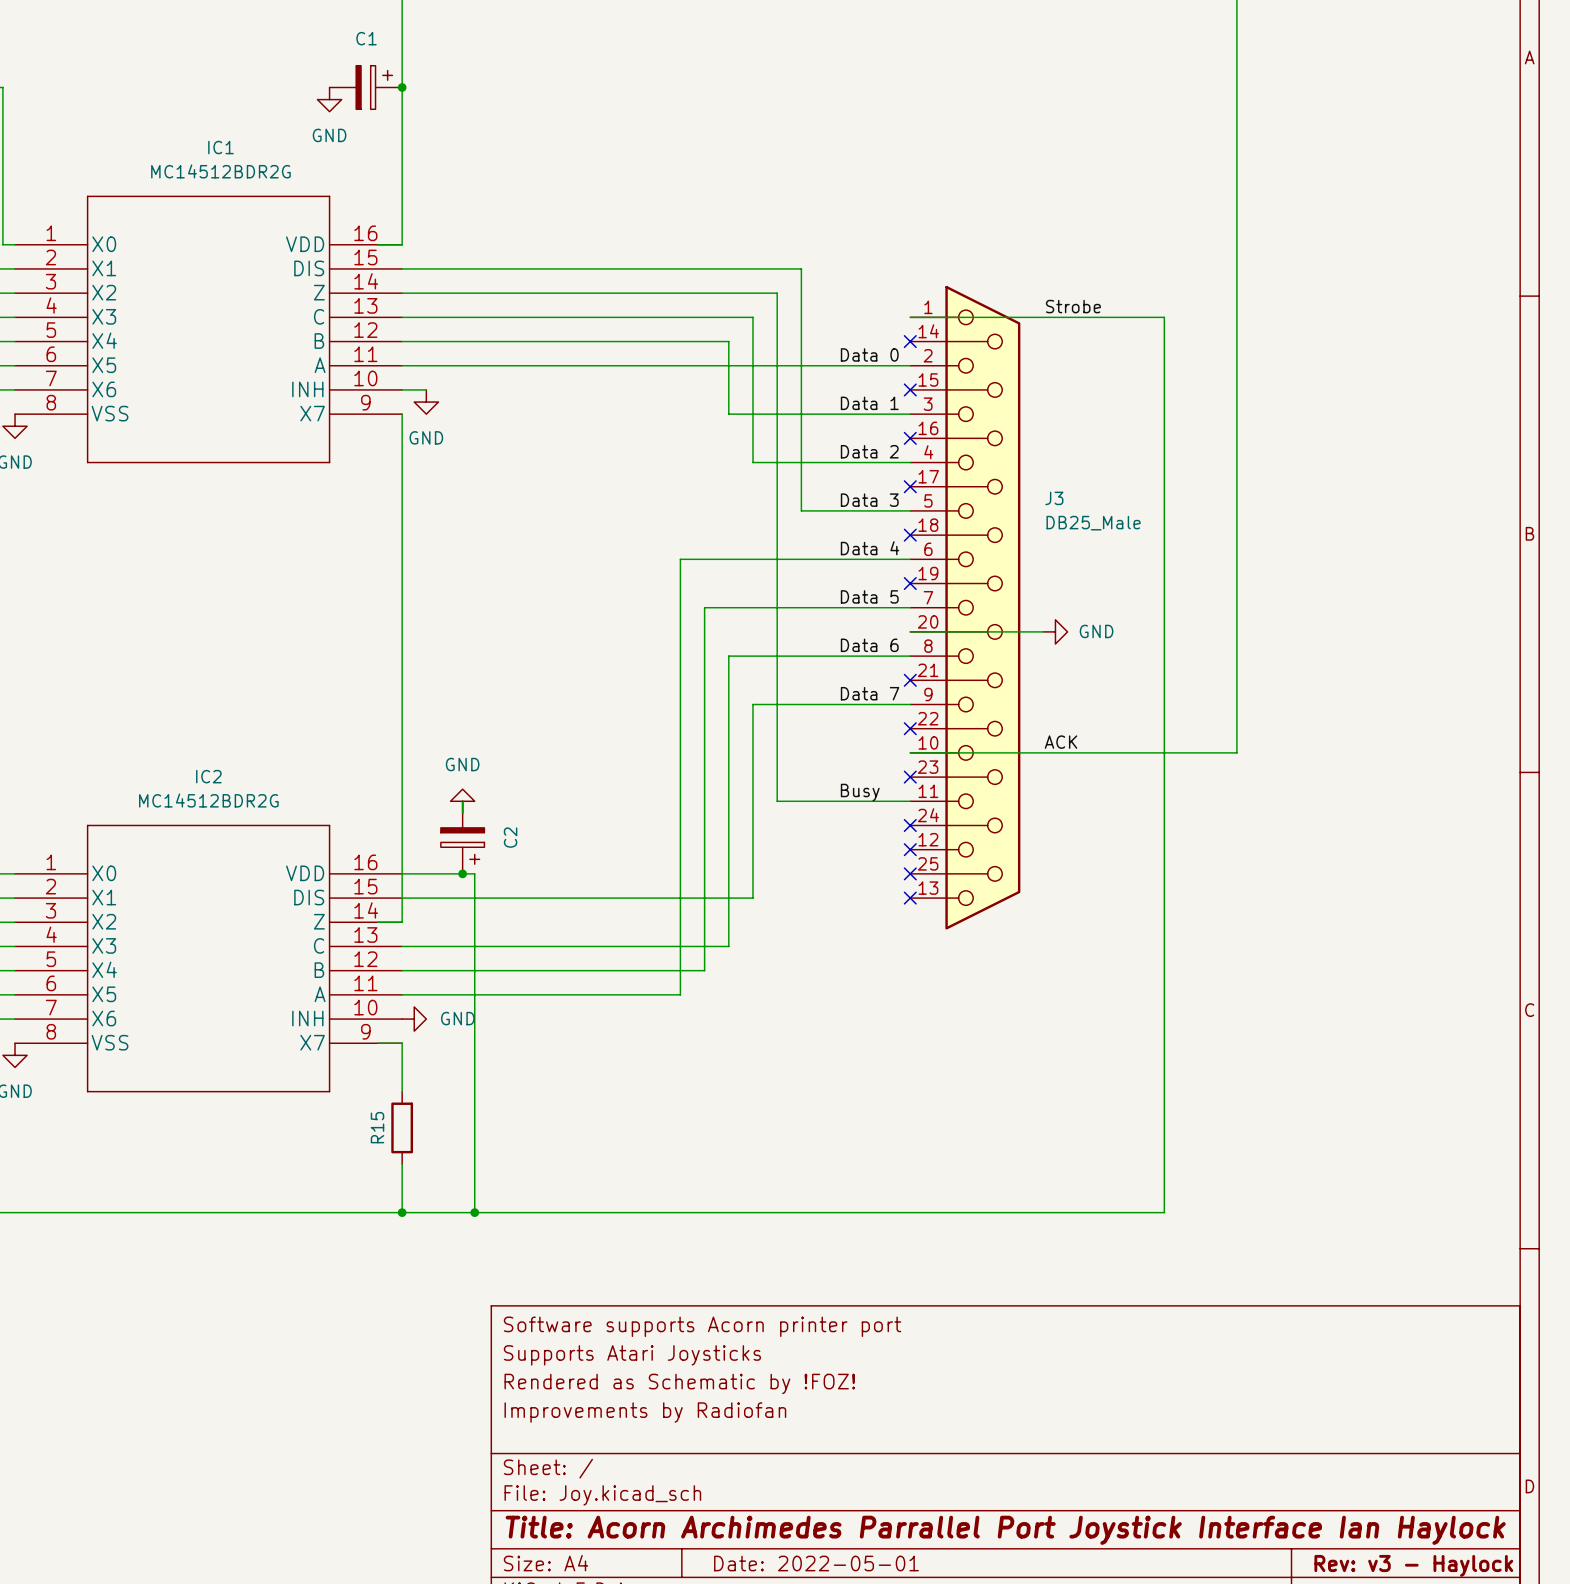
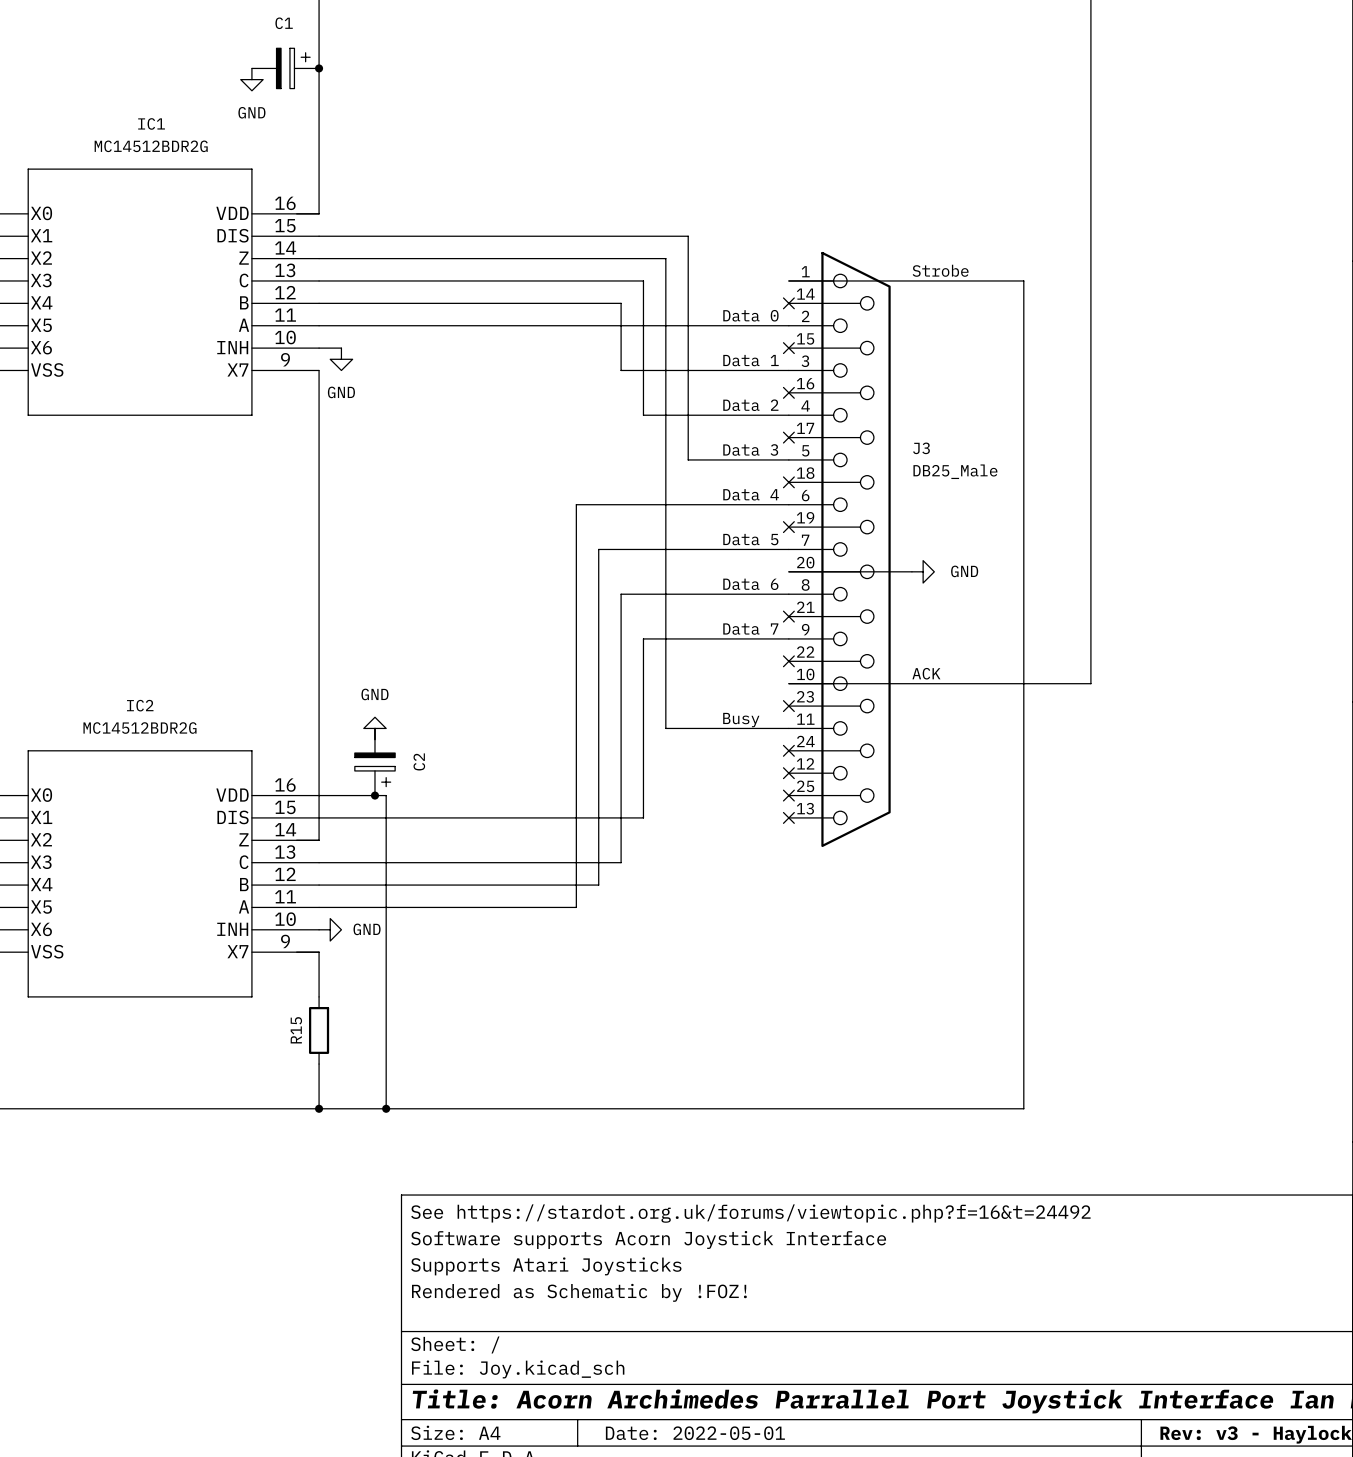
title block: Software supports Acorn printer port (702, 1326) -> See https://stardot.org.uk/forums/viewtopic.php?f=16&t=24492 (750, 1213)
title block: Supports Atari Joysticks (632, 1355) -> Software supports Acorn Joystick Interface (648, 1239)
title block: Rendered as Schematic by !FOZ! (679, 1383) -> Supports Atari Joysticks (546, 1266)
title block: Improvements by Radiofan (645, 1412) -> Rendered as Schematic by !FOZ! (579, 1292)

